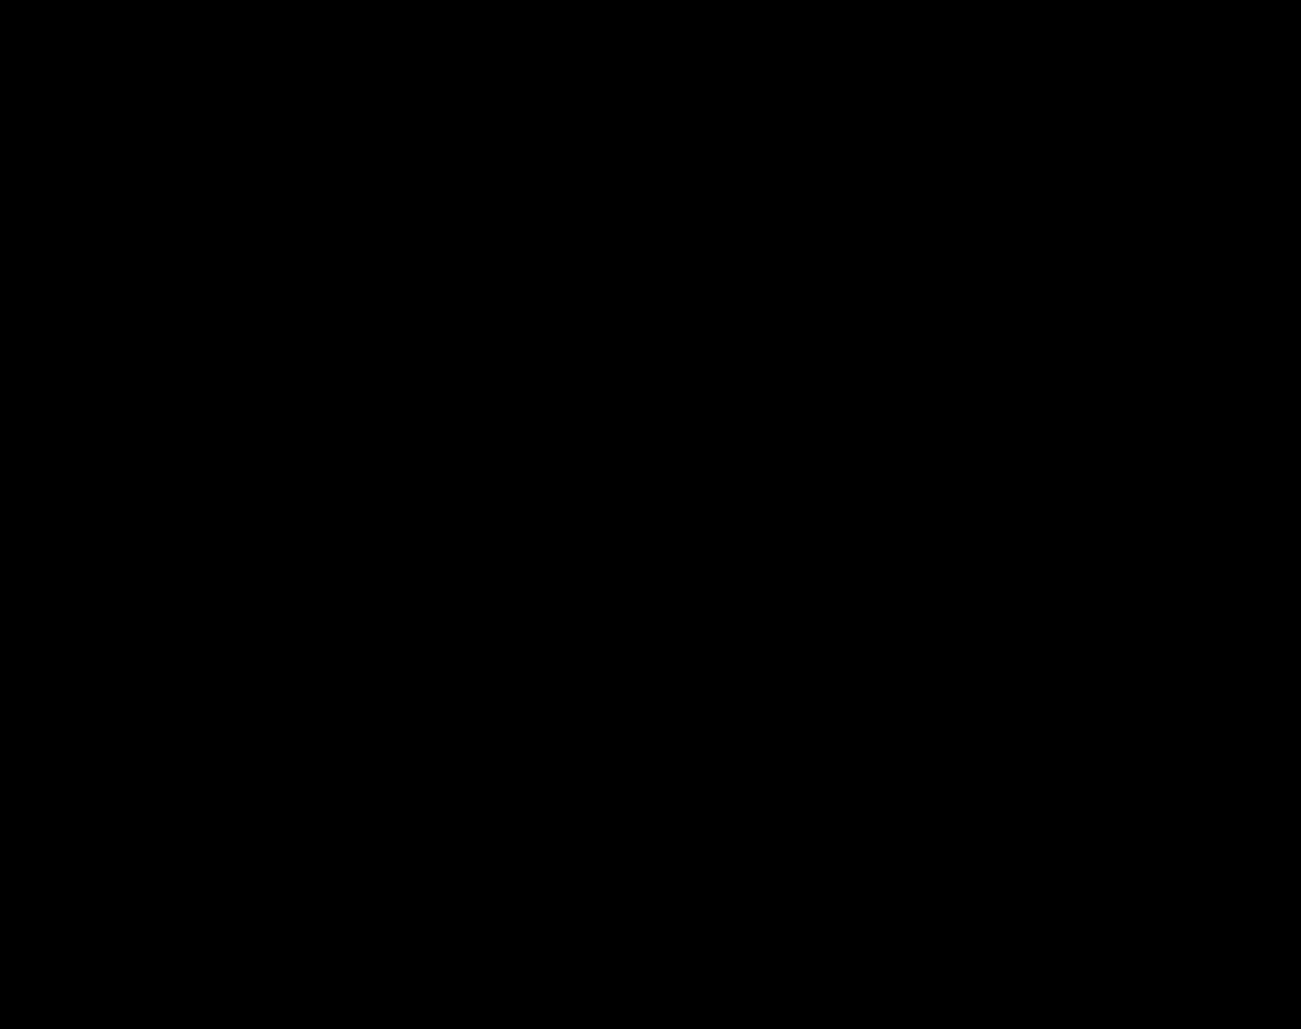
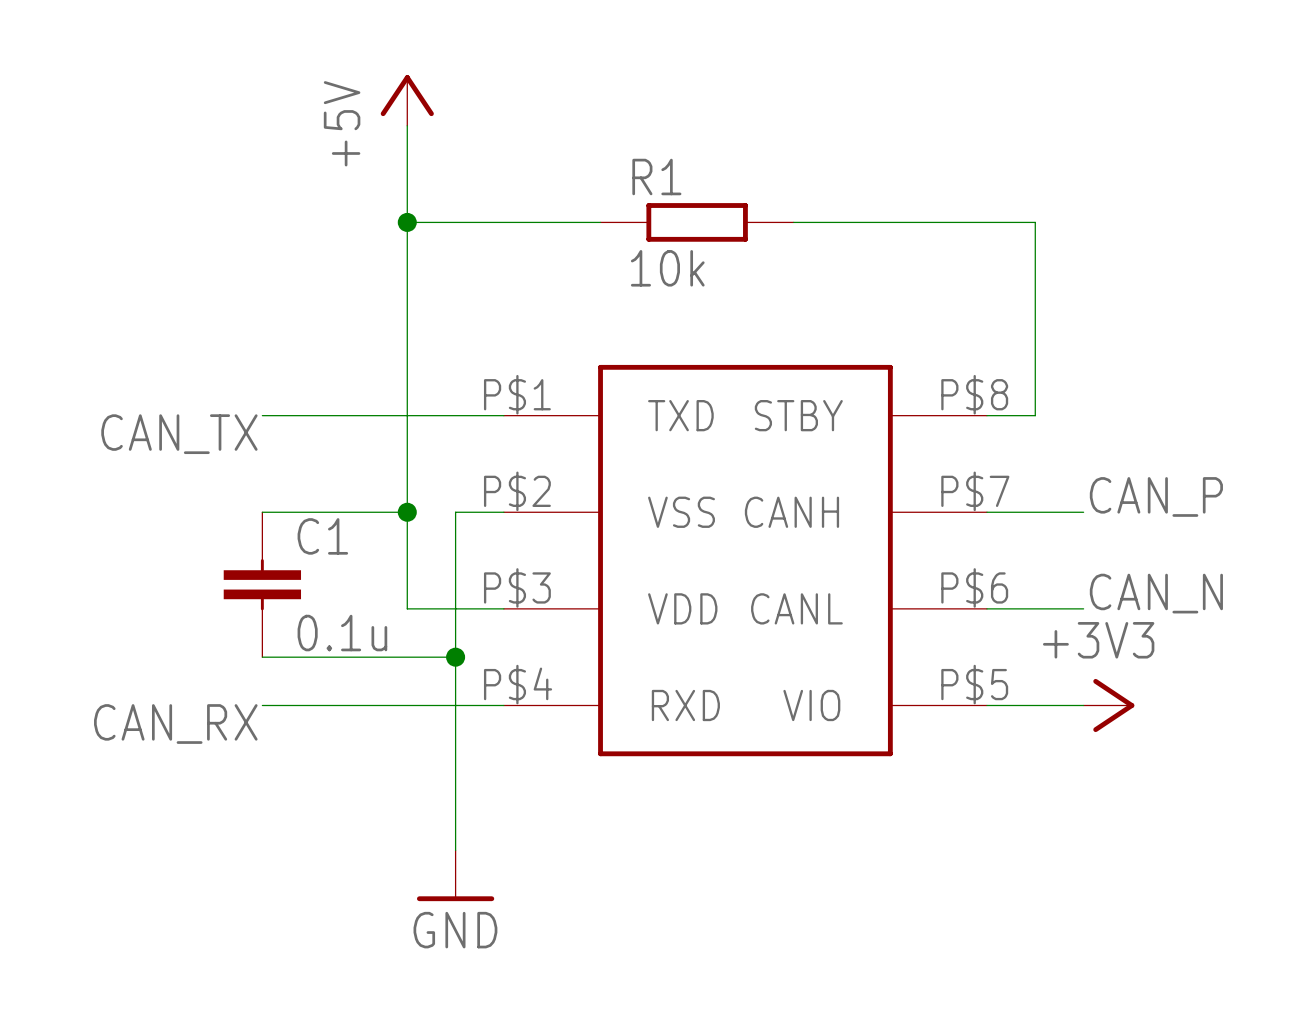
power symbol: none -> +5V (407, 100)
wire: none -> (407, 125) (407, 608) (503, 608)
wire: none -> (407, 222) (600, 222)
junction: none -> (407, 222)
R1: none -> 10k (697, 222)
wire: none -> (793, 222) (1035, 222) (1035, 415) (986, 415)
wire: none -> (262, 415) (503, 415)
label: none -> CAN_TX (179, 434)
label: none -> CAN_P (1156, 496)
wire: none -> (262, 512) (407, 512)
junction: none -> (407, 512)
wire: none -> (503, 512) (455, 512) (455, 850)
wire: none -> (986, 512) (1083, 512)
part: none -> (745, 560)
C1: none -> 0.1u (262, 584)
label: none -> CAN_N (1156, 593)
wire: none -> (986, 608) (1083, 608)
wire: none -> (262, 657) (455, 657)
junction: none -> (455, 657)
wire: none -> (262, 705) (503, 705)
wire: none -> (986, 705) (1083, 705)
power symbol: none -> +3V3 (1108, 705)
label: none -> CAN_RX (175, 724)
power symbol: none -> GND (455, 875)

